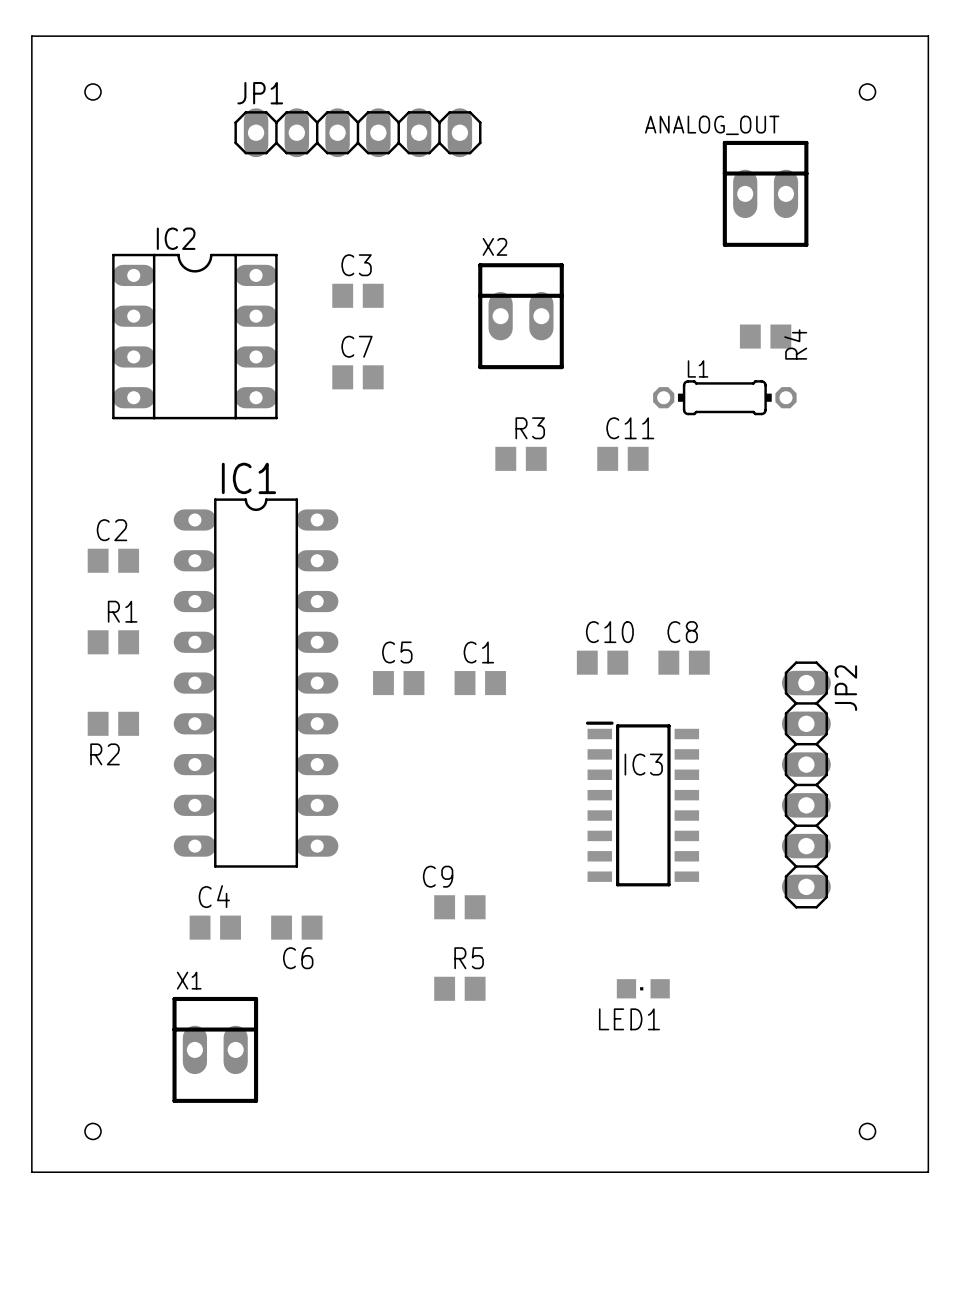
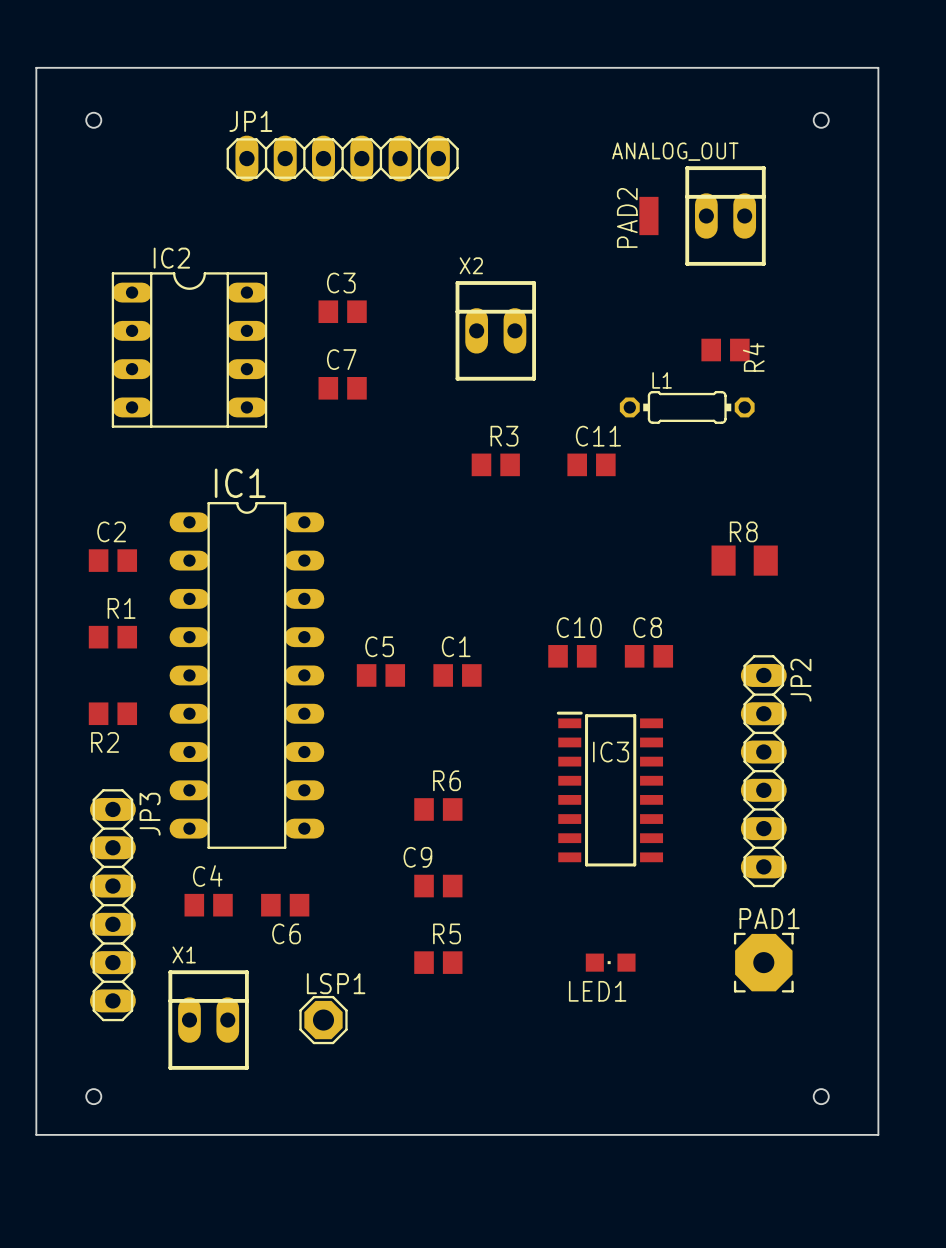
PAD2: none -> (648, 216)
R8: none -> (744, 560)
R6: none -> (438, 809)
JP3: none -> (112, 905)
PAD1: none -> (763, 962)
LSP1: none -> (323, 1020)

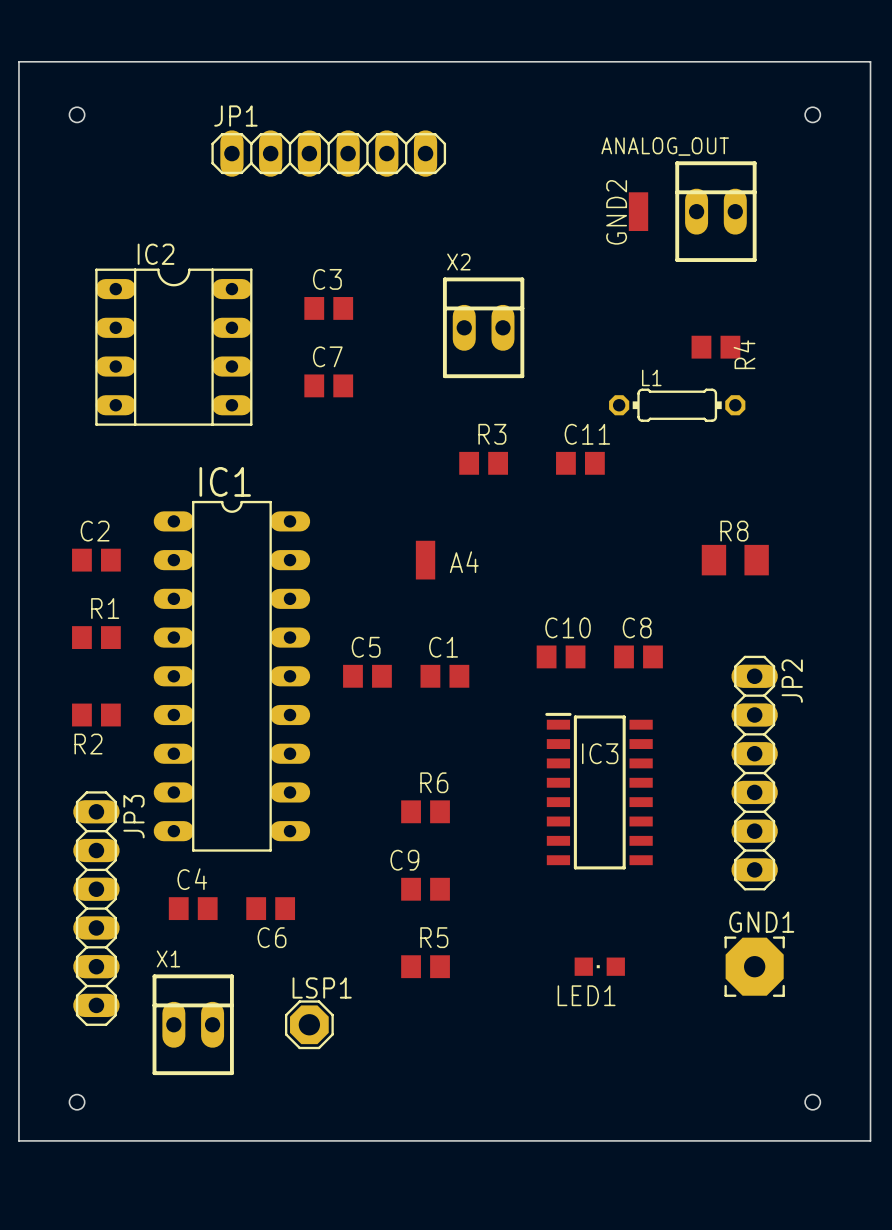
PAD2 name: PAD2 (627, 217) -> GND2 (616, 212)
A4: none -> (425, 560)
PAD1 name: PAD1 (769, 918) -> GND1 (761, 922)

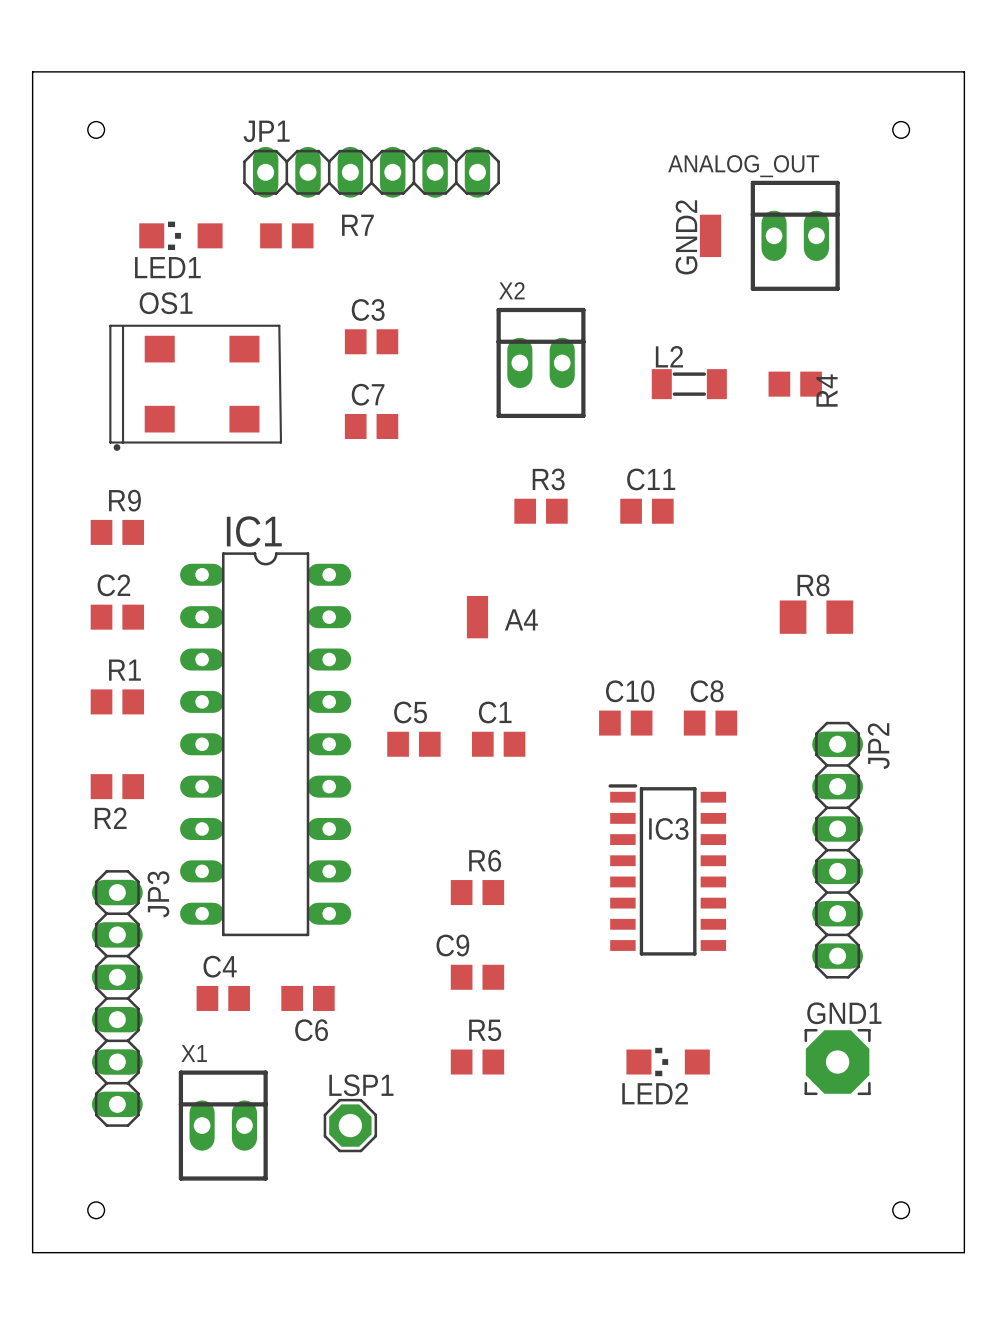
R7: none -> (286, 235)
IC2: (173, 347) -> none
L2: none -> (689, 384)
OS1: none -> (195, 387)
L1: (677, 405) -> none
R9: none -> (117, 532)
LED1 footprint: [574, 957, 625, 976] -> [139, 221, 223, 251]
LED2: none -> (668, 1062)

